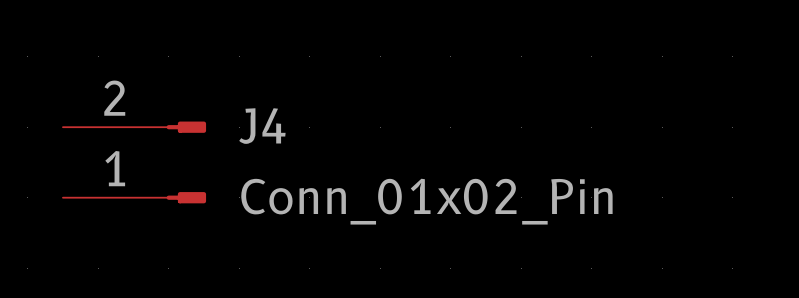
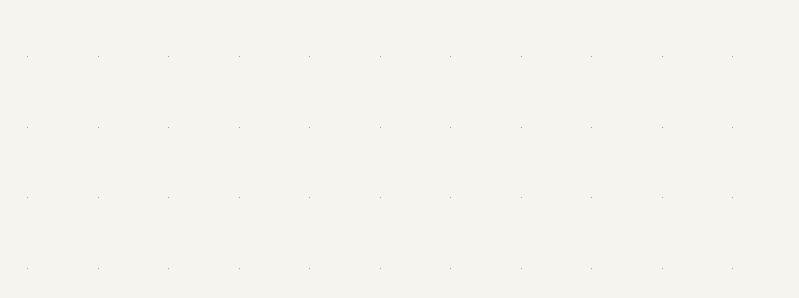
J4: Conn_01x02_Pin (134, 162) -> none

